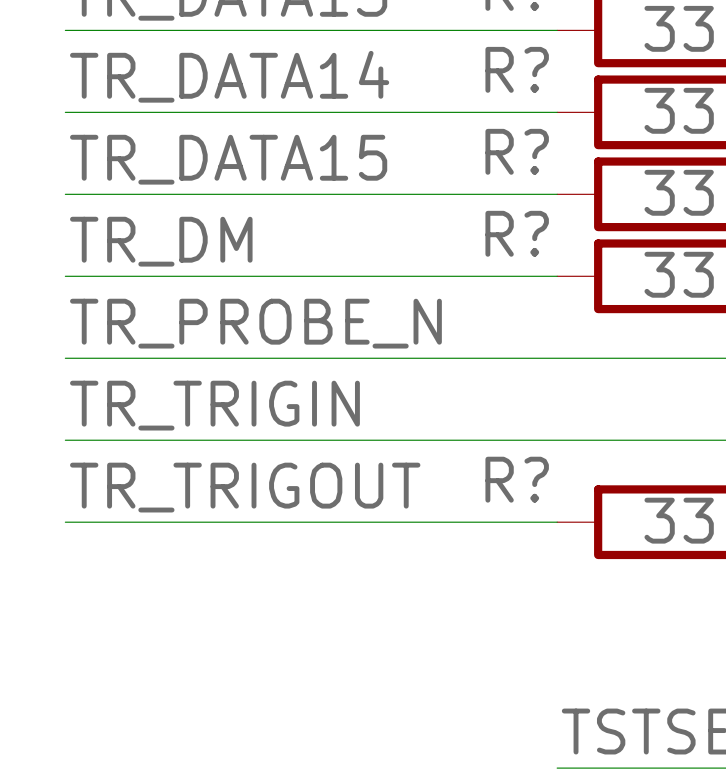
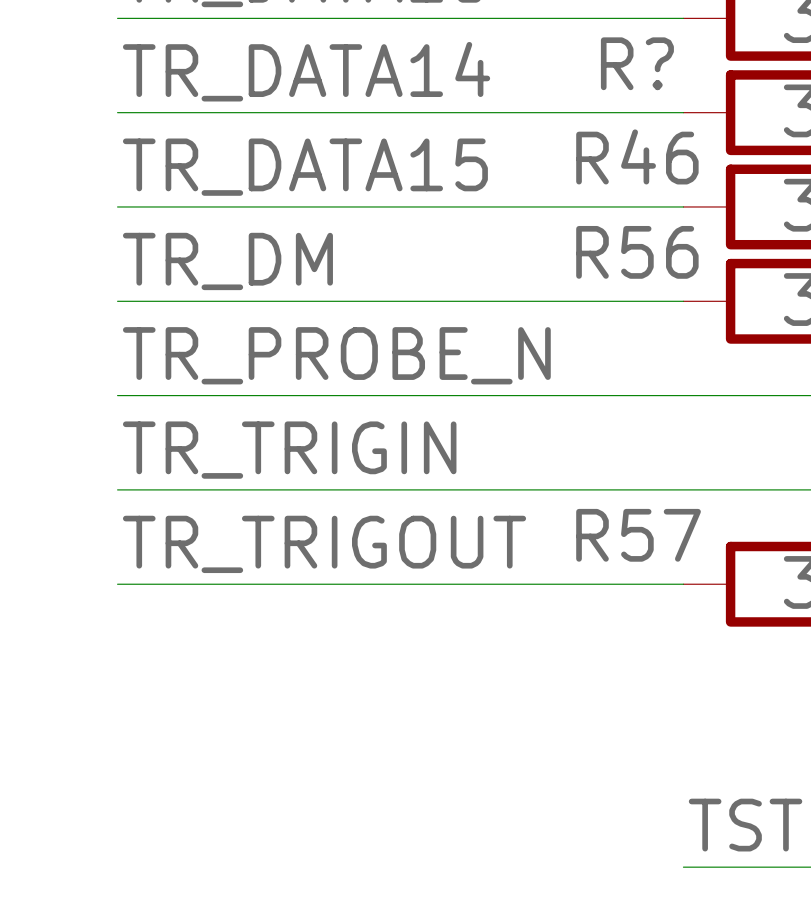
R? name: R? (517, 151) -> R46 (637, 156)
R? name: R? (517, 233) -> R56 (637, 252)
R? name: R? (517, 479) -> R57 (638, 535)

